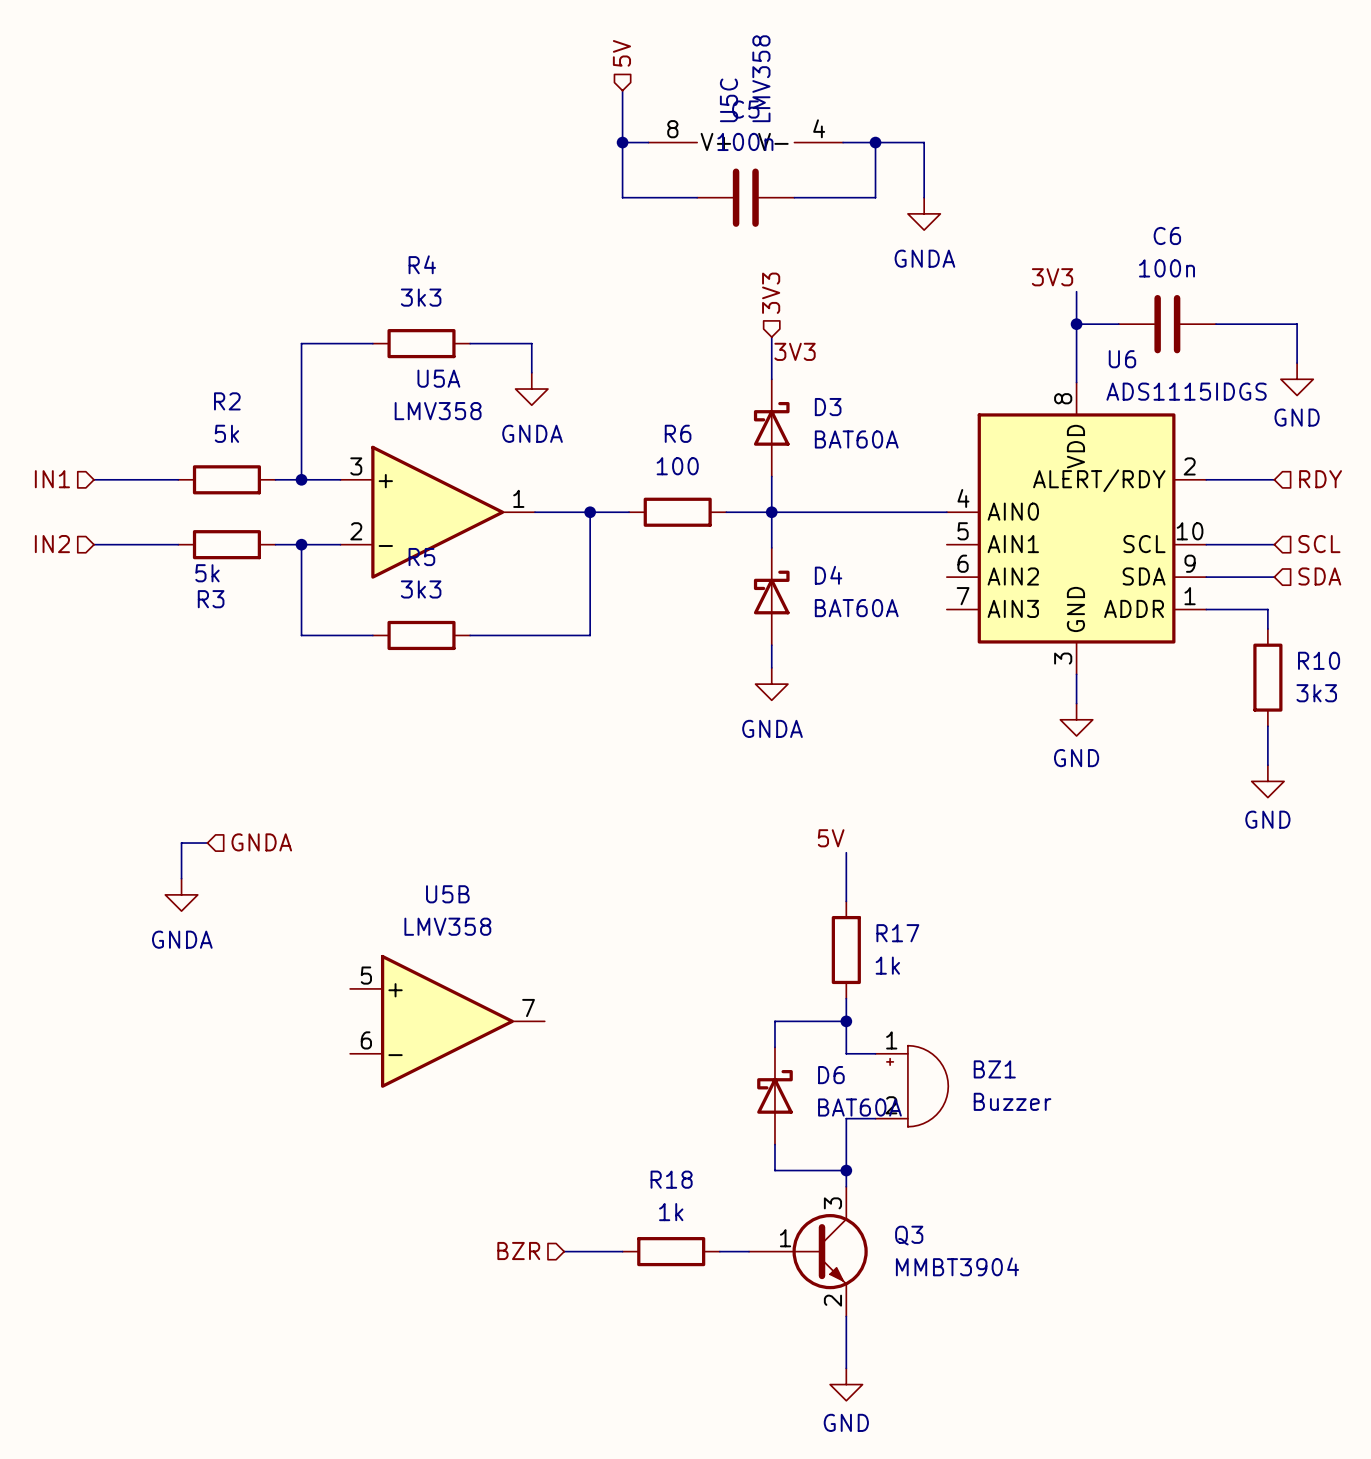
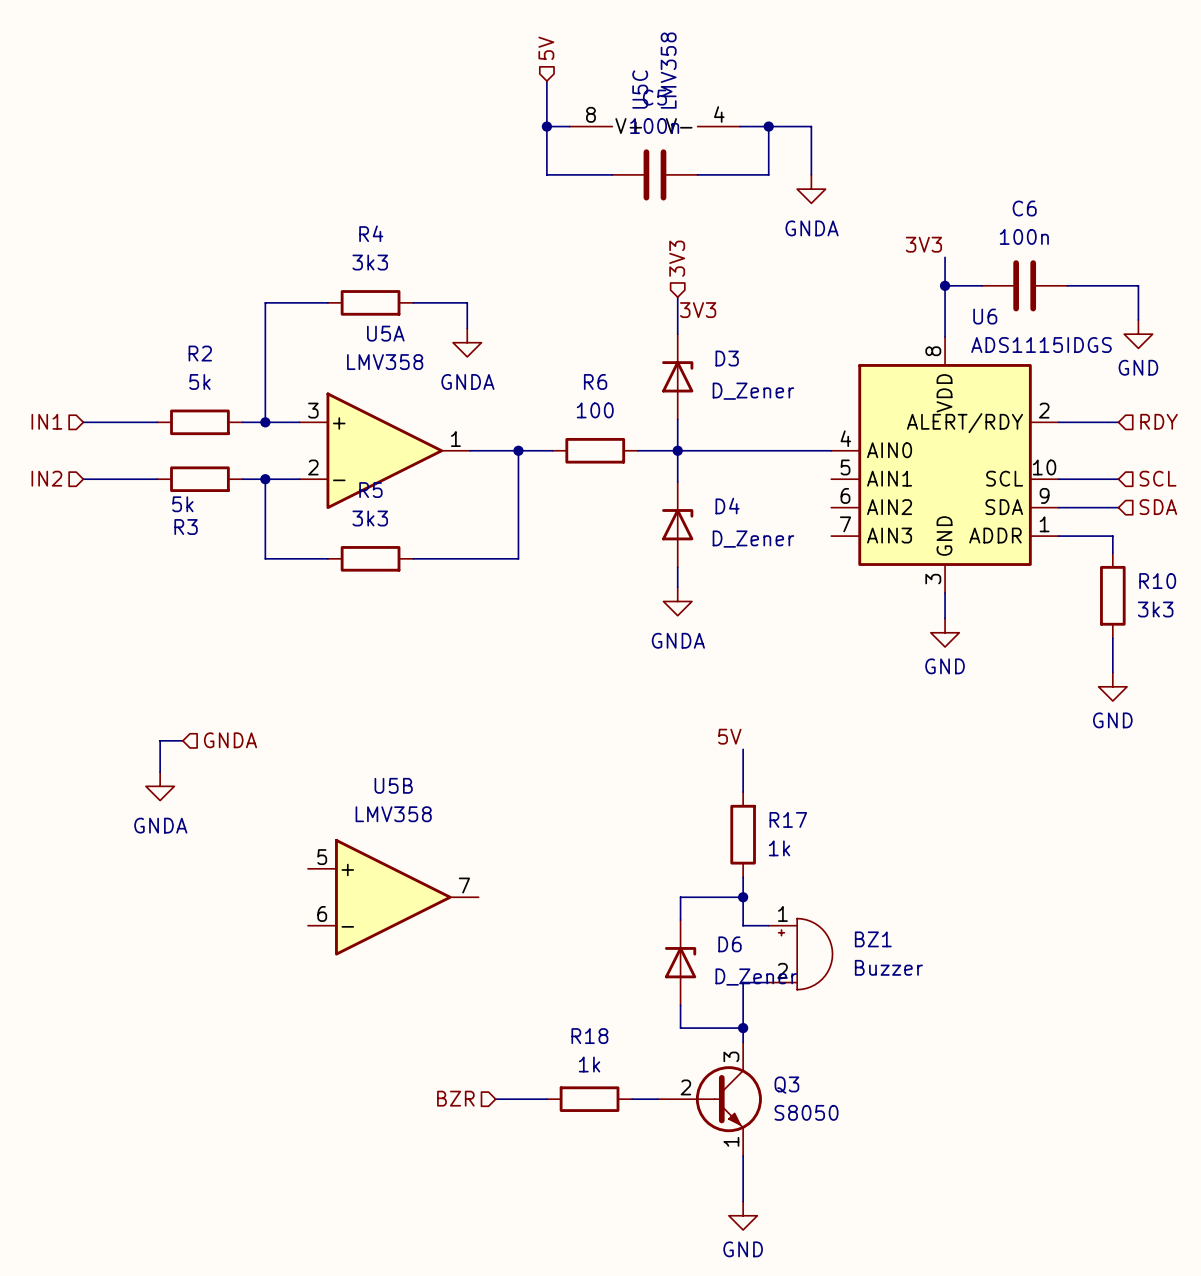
D3 symbol: [753, 379, 790, 477] -> [662, 334, 694, 420]
D3 value: BAT60A (856, 439) -> D_Zener (753, 391)
D4 symbol: [753, 547, 790, 646] -> [662, 482, 694, 568]
D4 value: BAT60A (856, 608) -> D_Zener (753, 539)
D6 symbol: [757, 1047, 793, 1145] -> [664, 920, 697, 1006]
D6 value: BAT60A (859, 1107) -> D_Zener (756, 977)
Q3 symbol: [749, 1186, 868, 1317] -> [657, 1042, 762, 1157]
Q3 value: MMBT3904 (957, 1266) -> S8050 (806, 1112)

